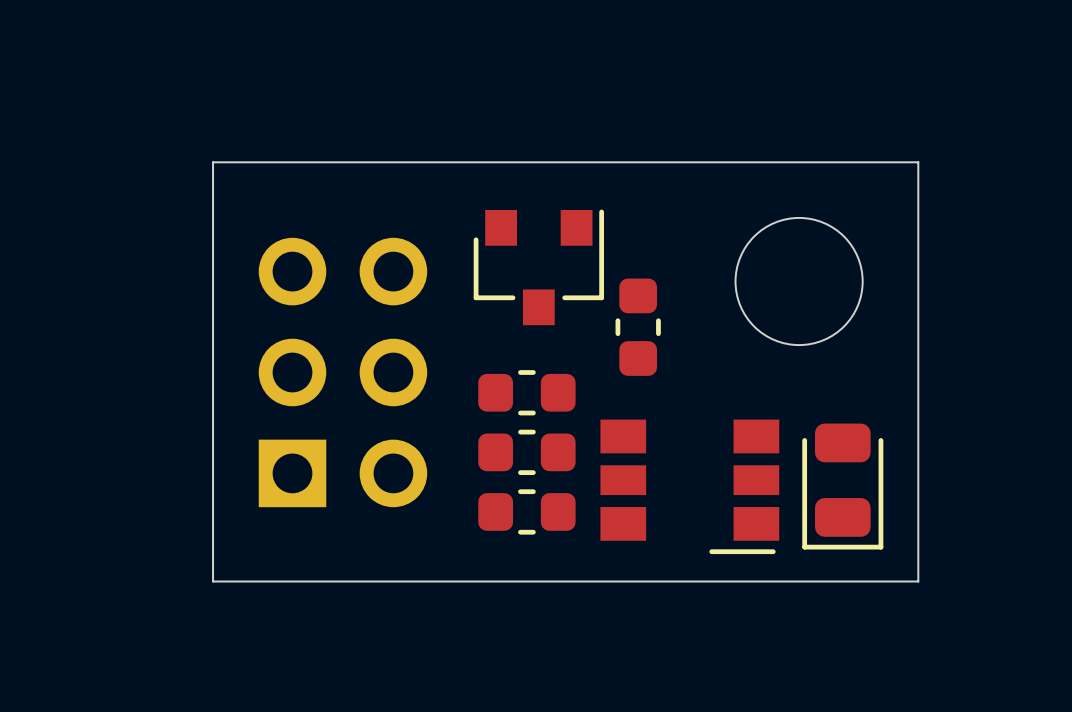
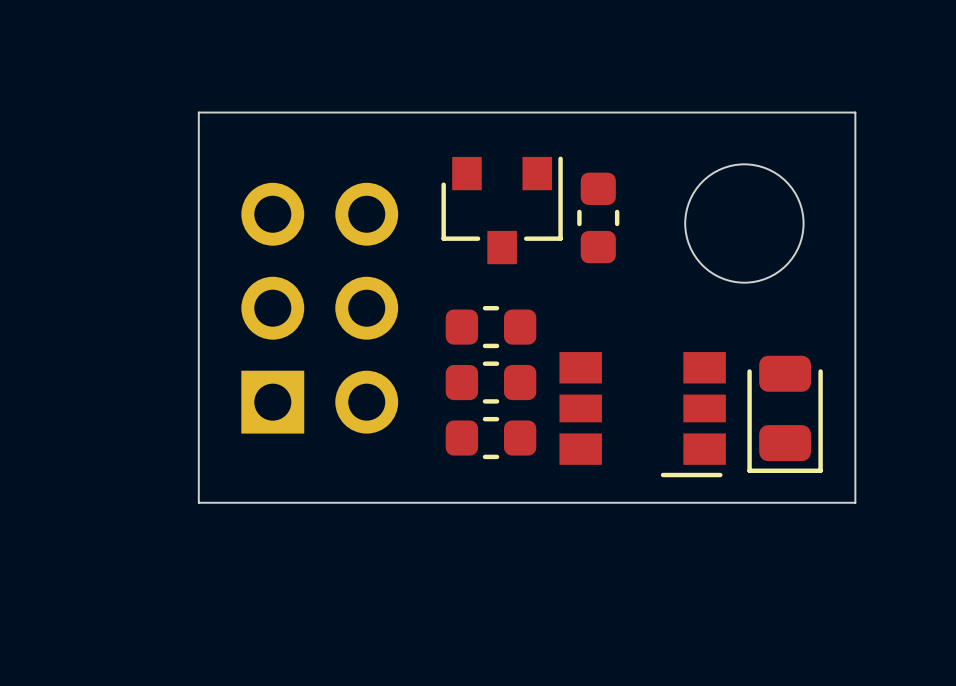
part position: (638, 327) -> (598, 217)

